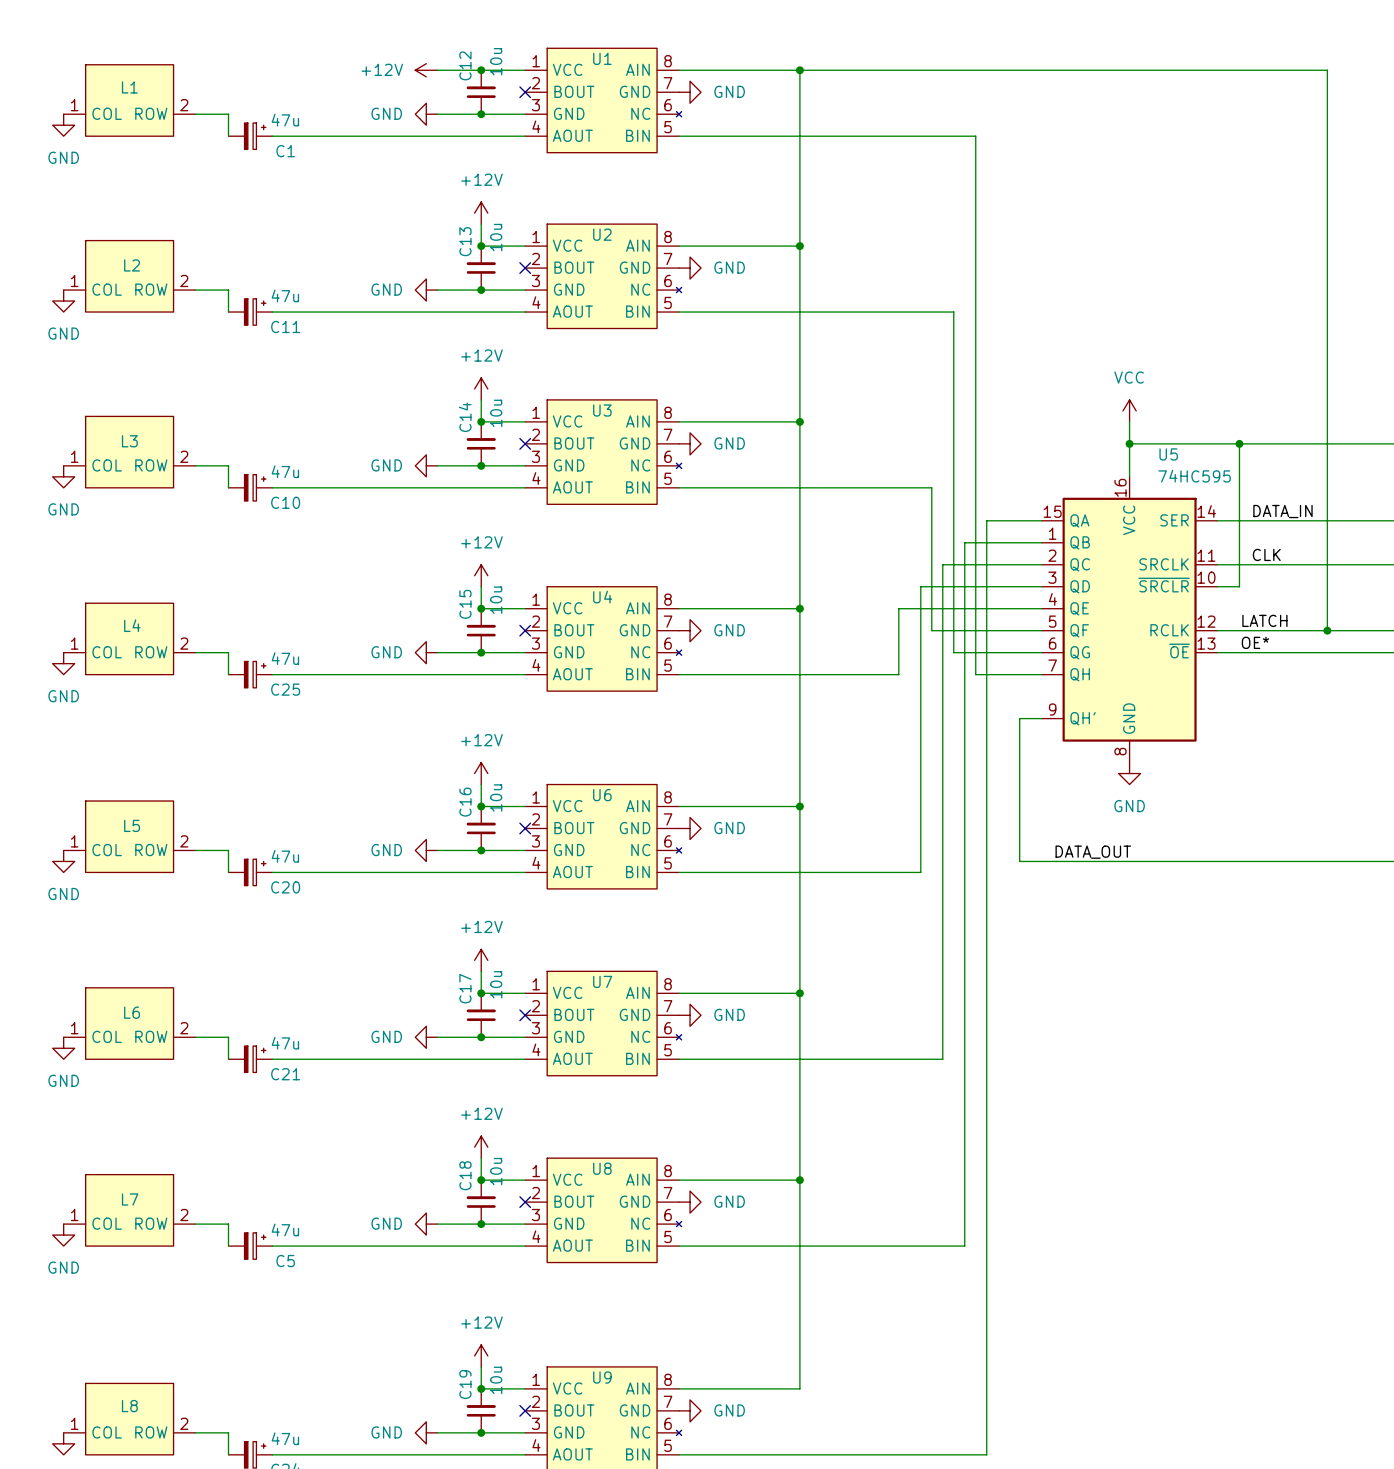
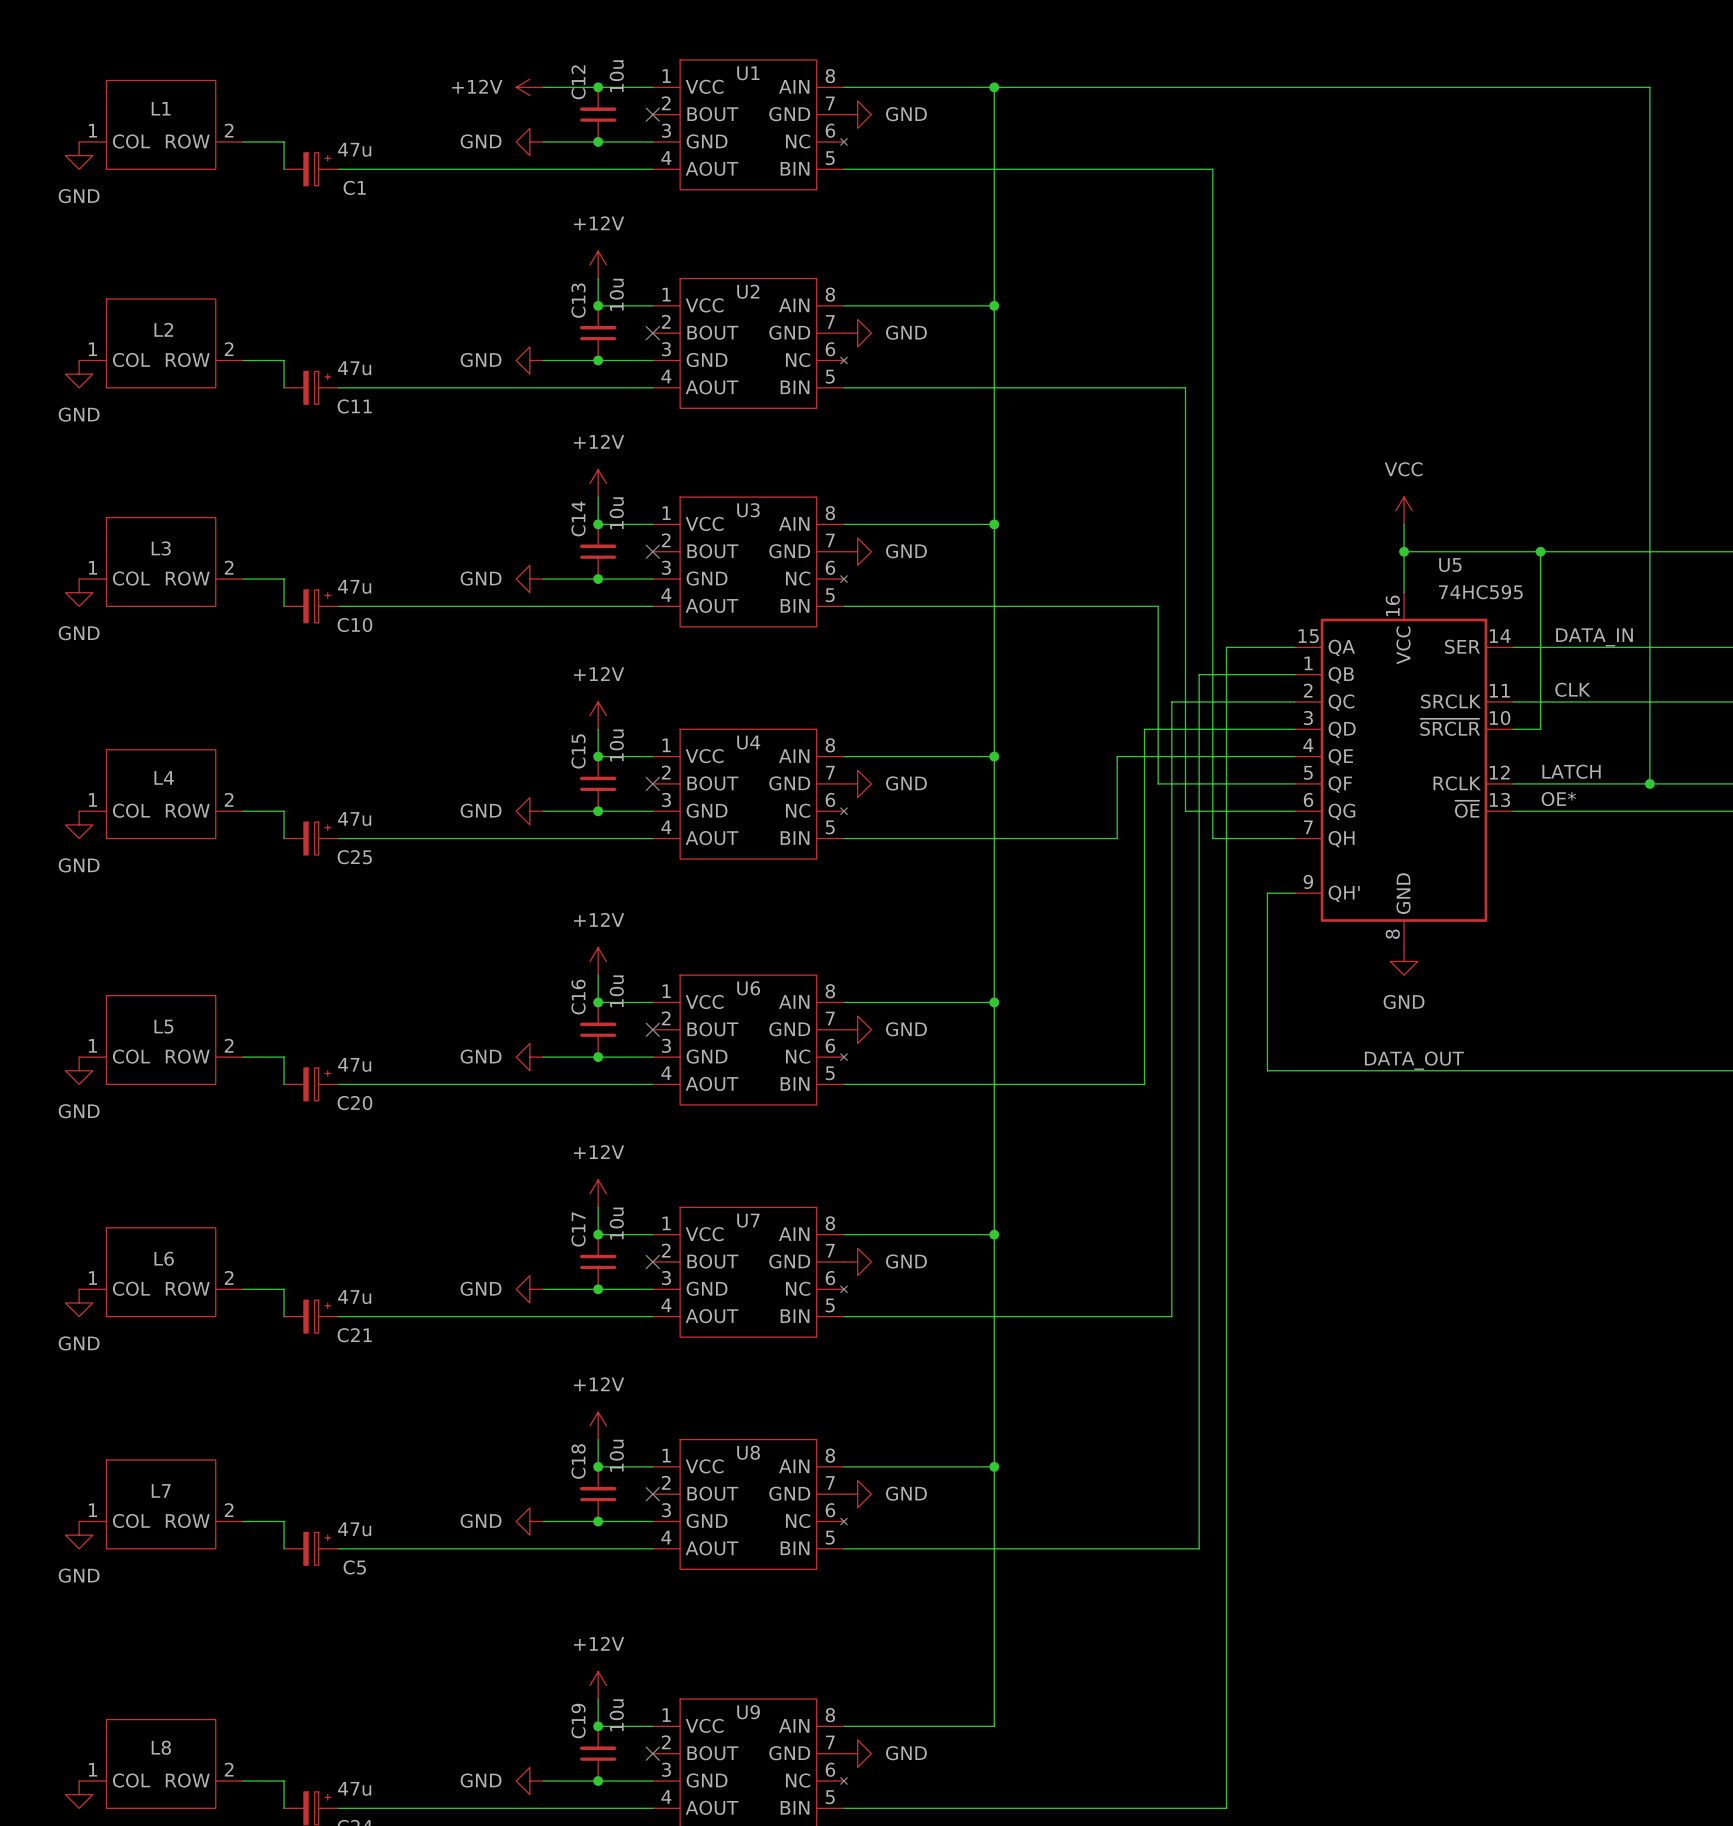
label position: DATA_OUT (1093, 852) -> DATA_OUT (1414, 1060)

